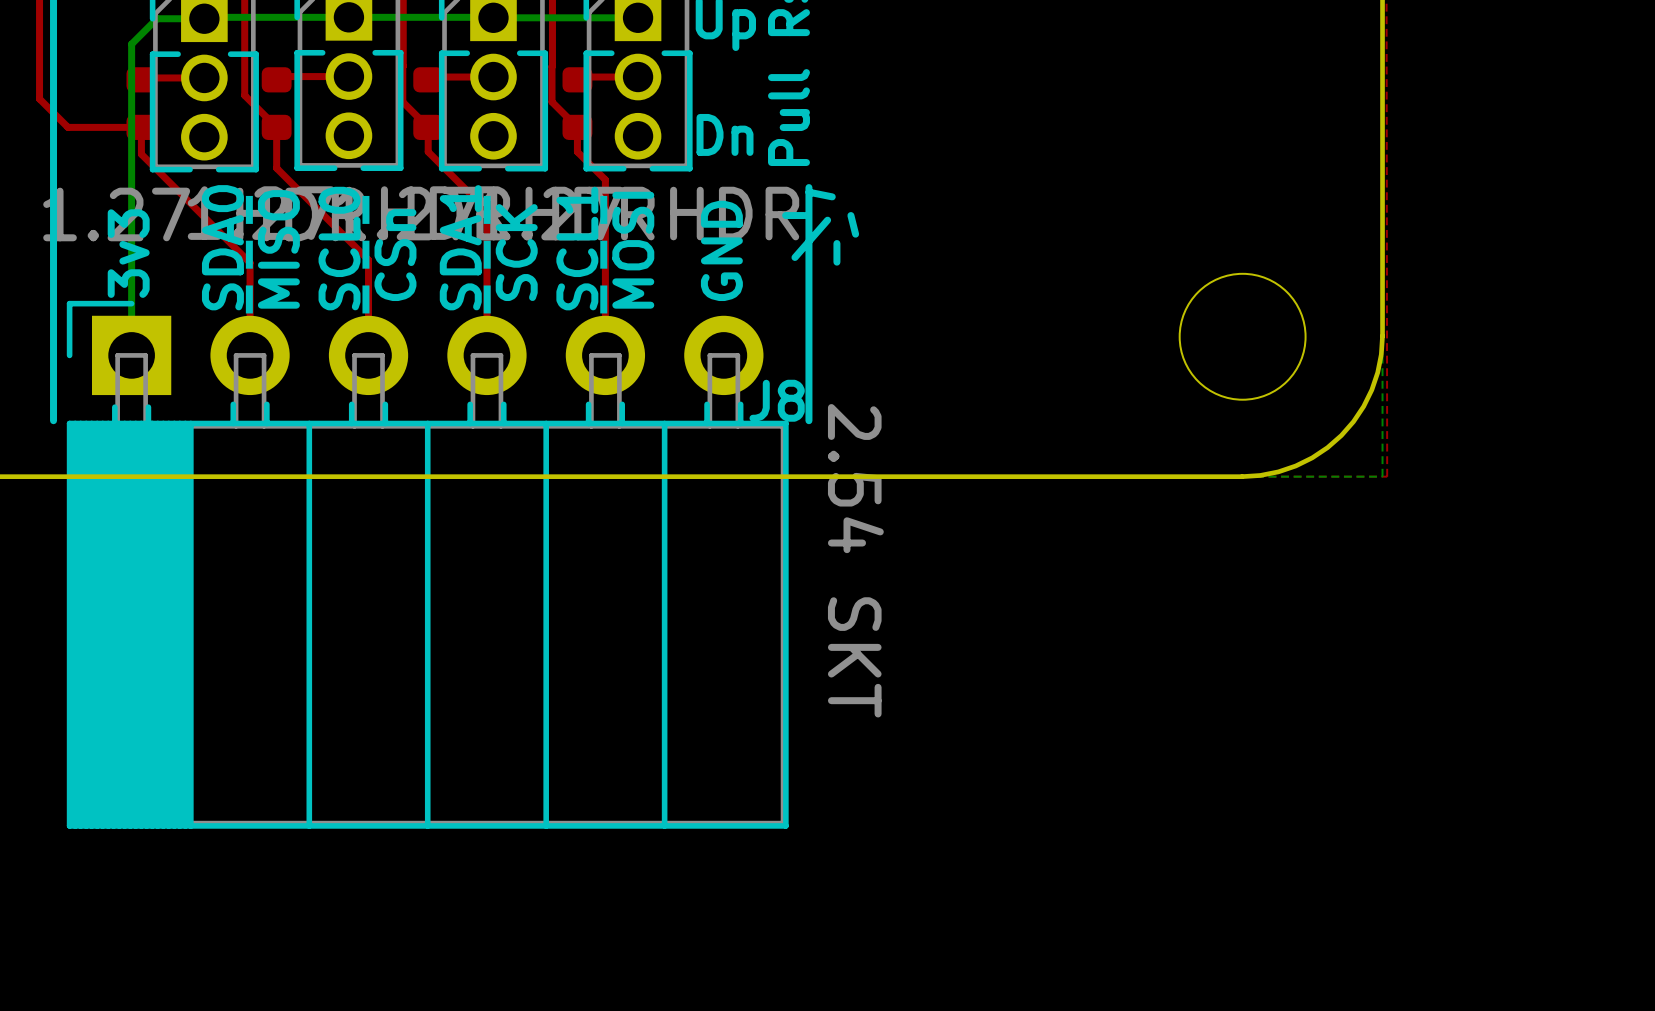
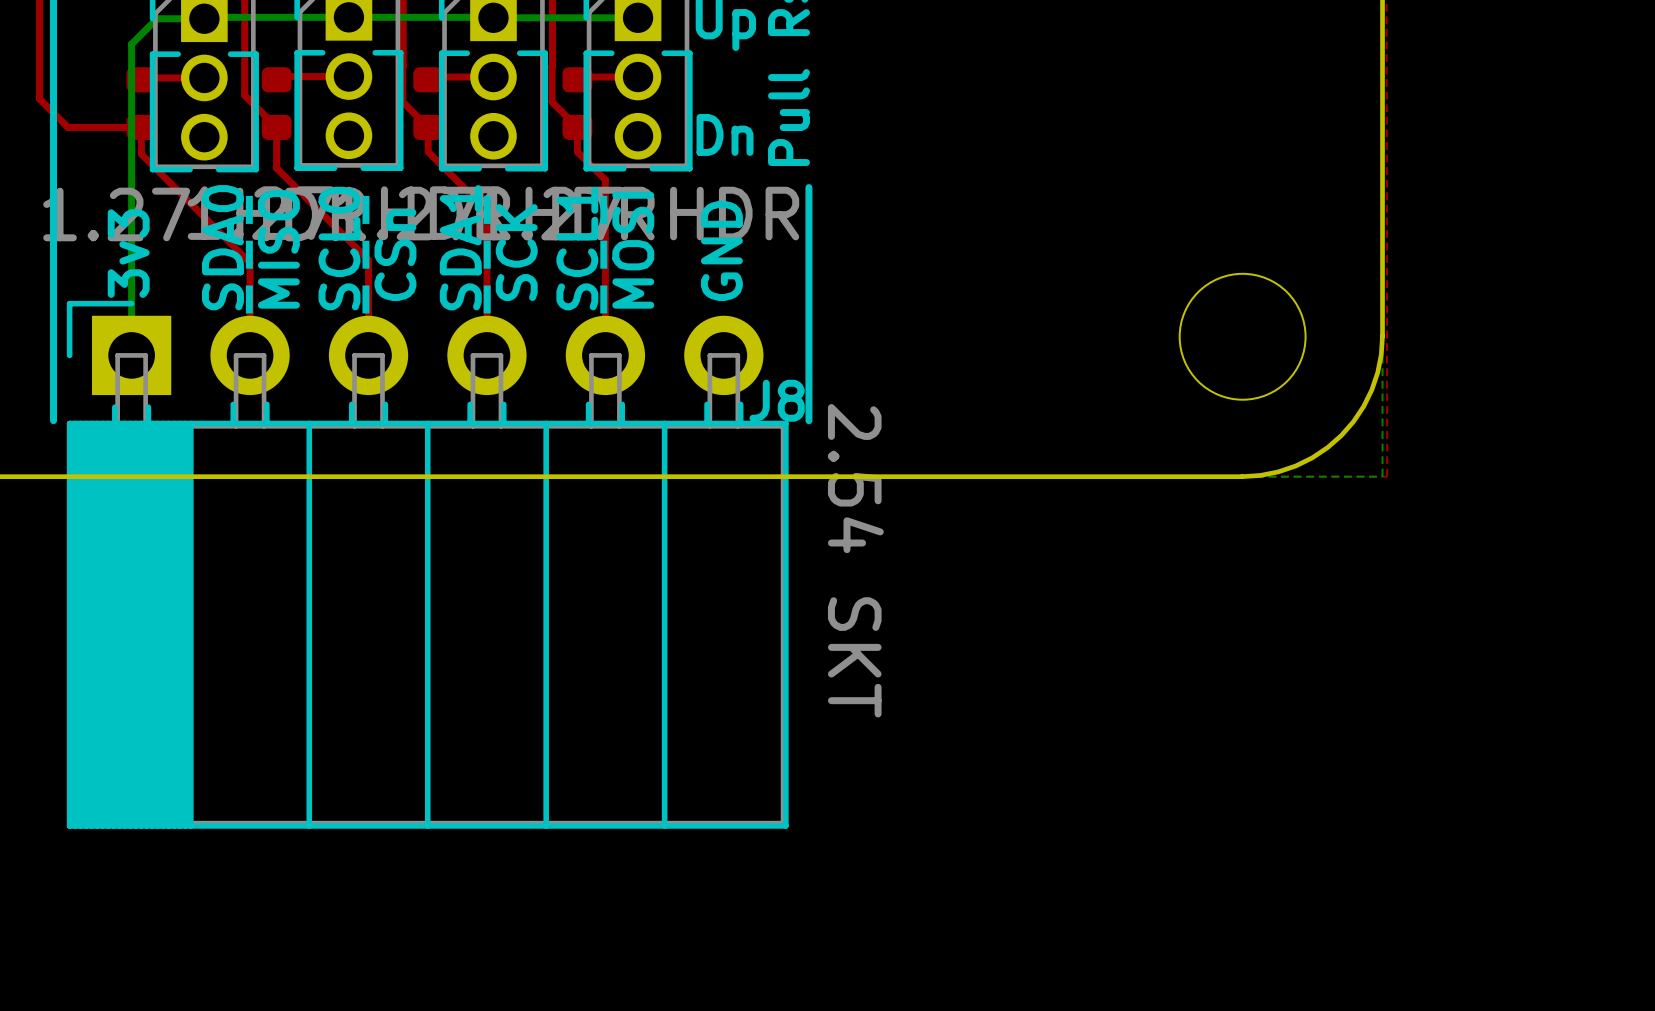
line: (808, 192) (832, 196) -> none
line: (804, 215) (785, 215) -> none
line: (850, 215) (855, 234) -> none
line: (827, 220) (794, 257) -> none
line: (836, 243) (836, 262) -> none

